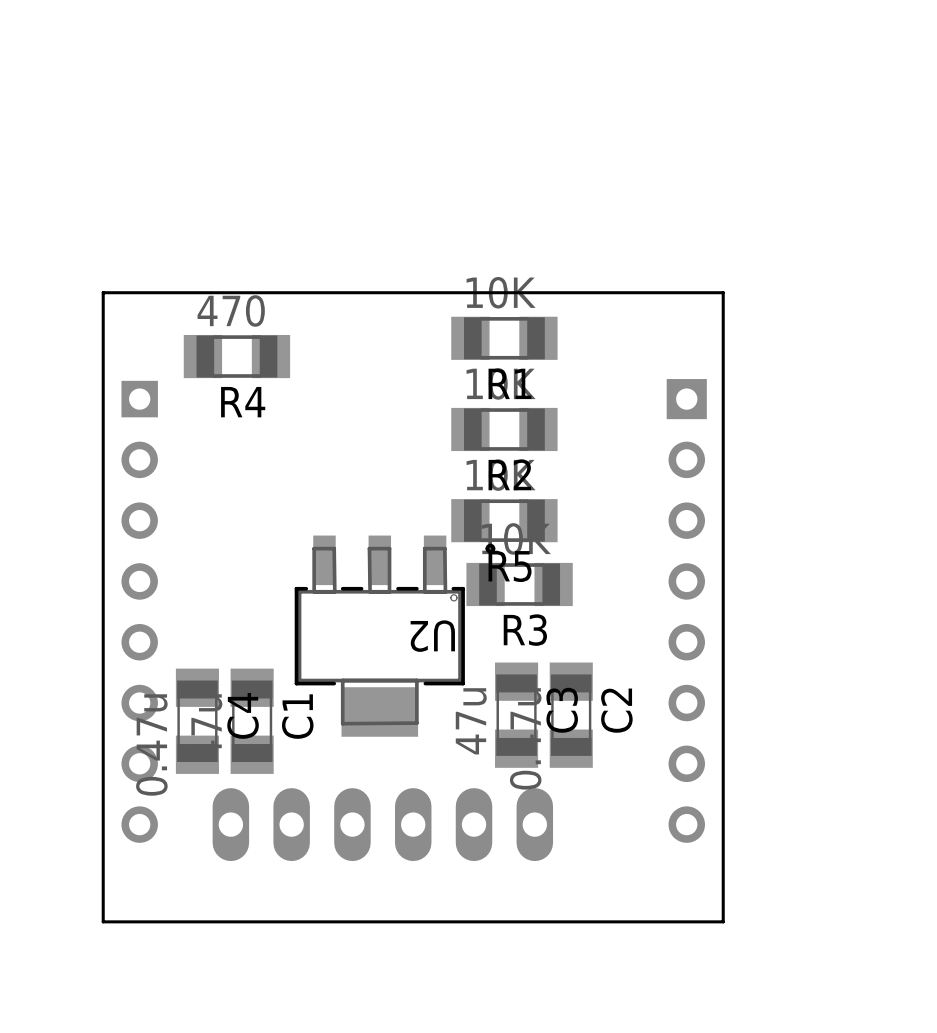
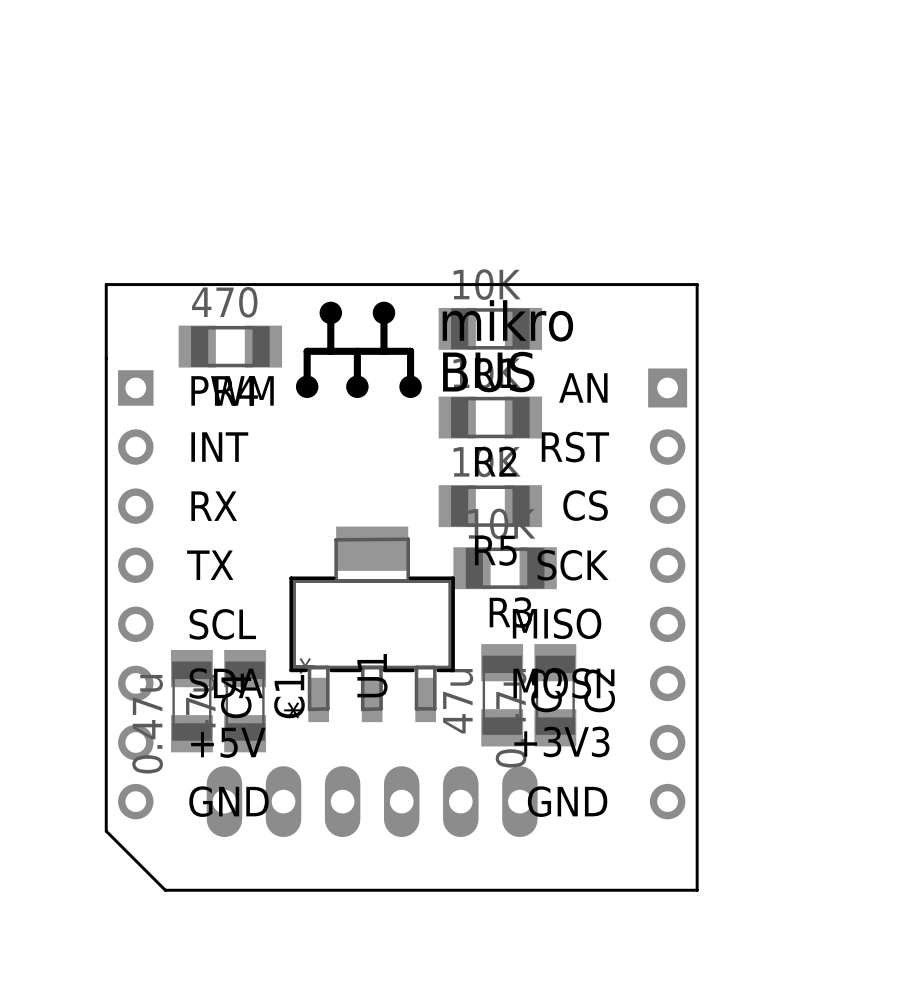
part footprint: [101, 291, 725, 924] -> [104, 283, 699, 892]
U2: (394, 636) -> none
U1: none -> (372, 624)

